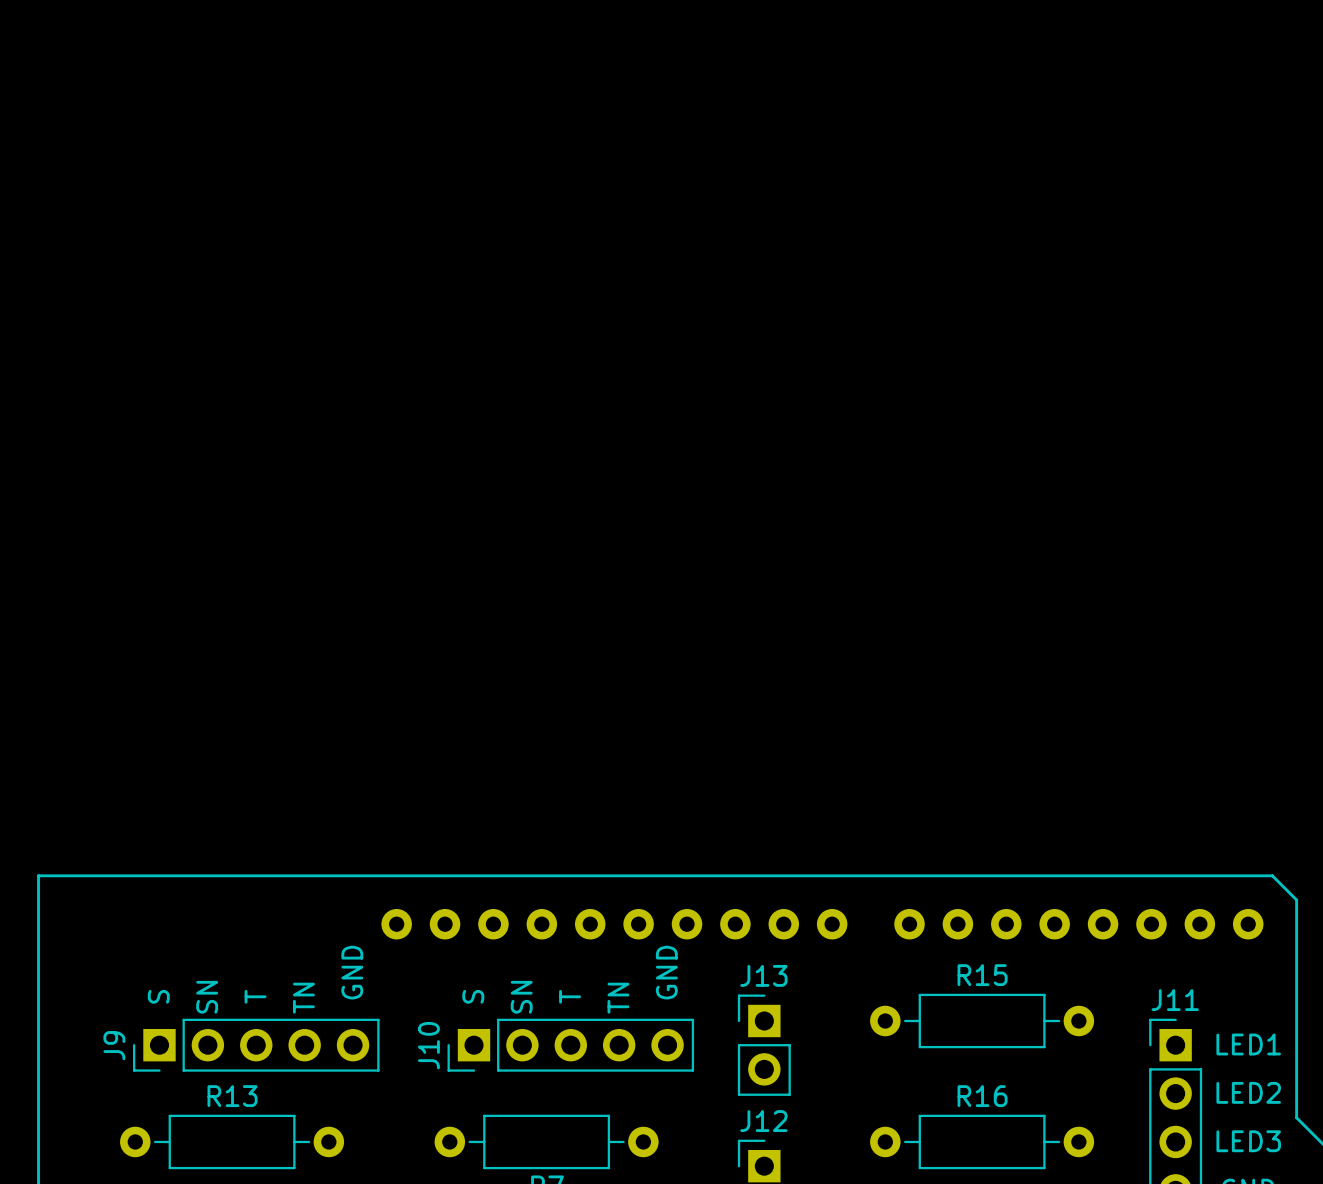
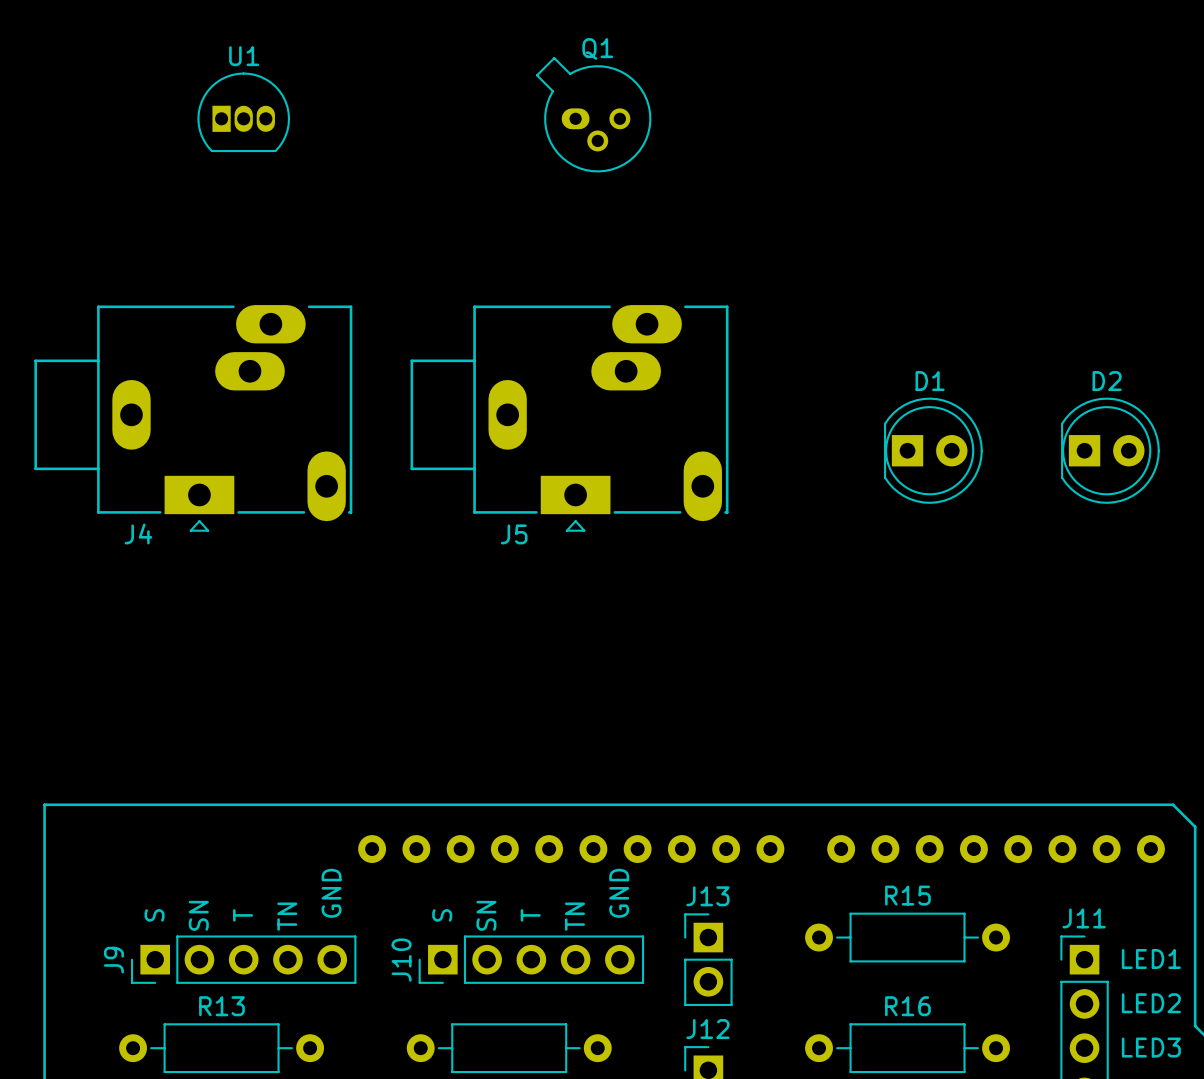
U1: none -> (243, 112)
Q1: none -> (593, 114)
J4: none -> (193, 418)
J5: none -> (569, 418)
D1: none -> (933, 450)
D2: none -> (1110, 450)

